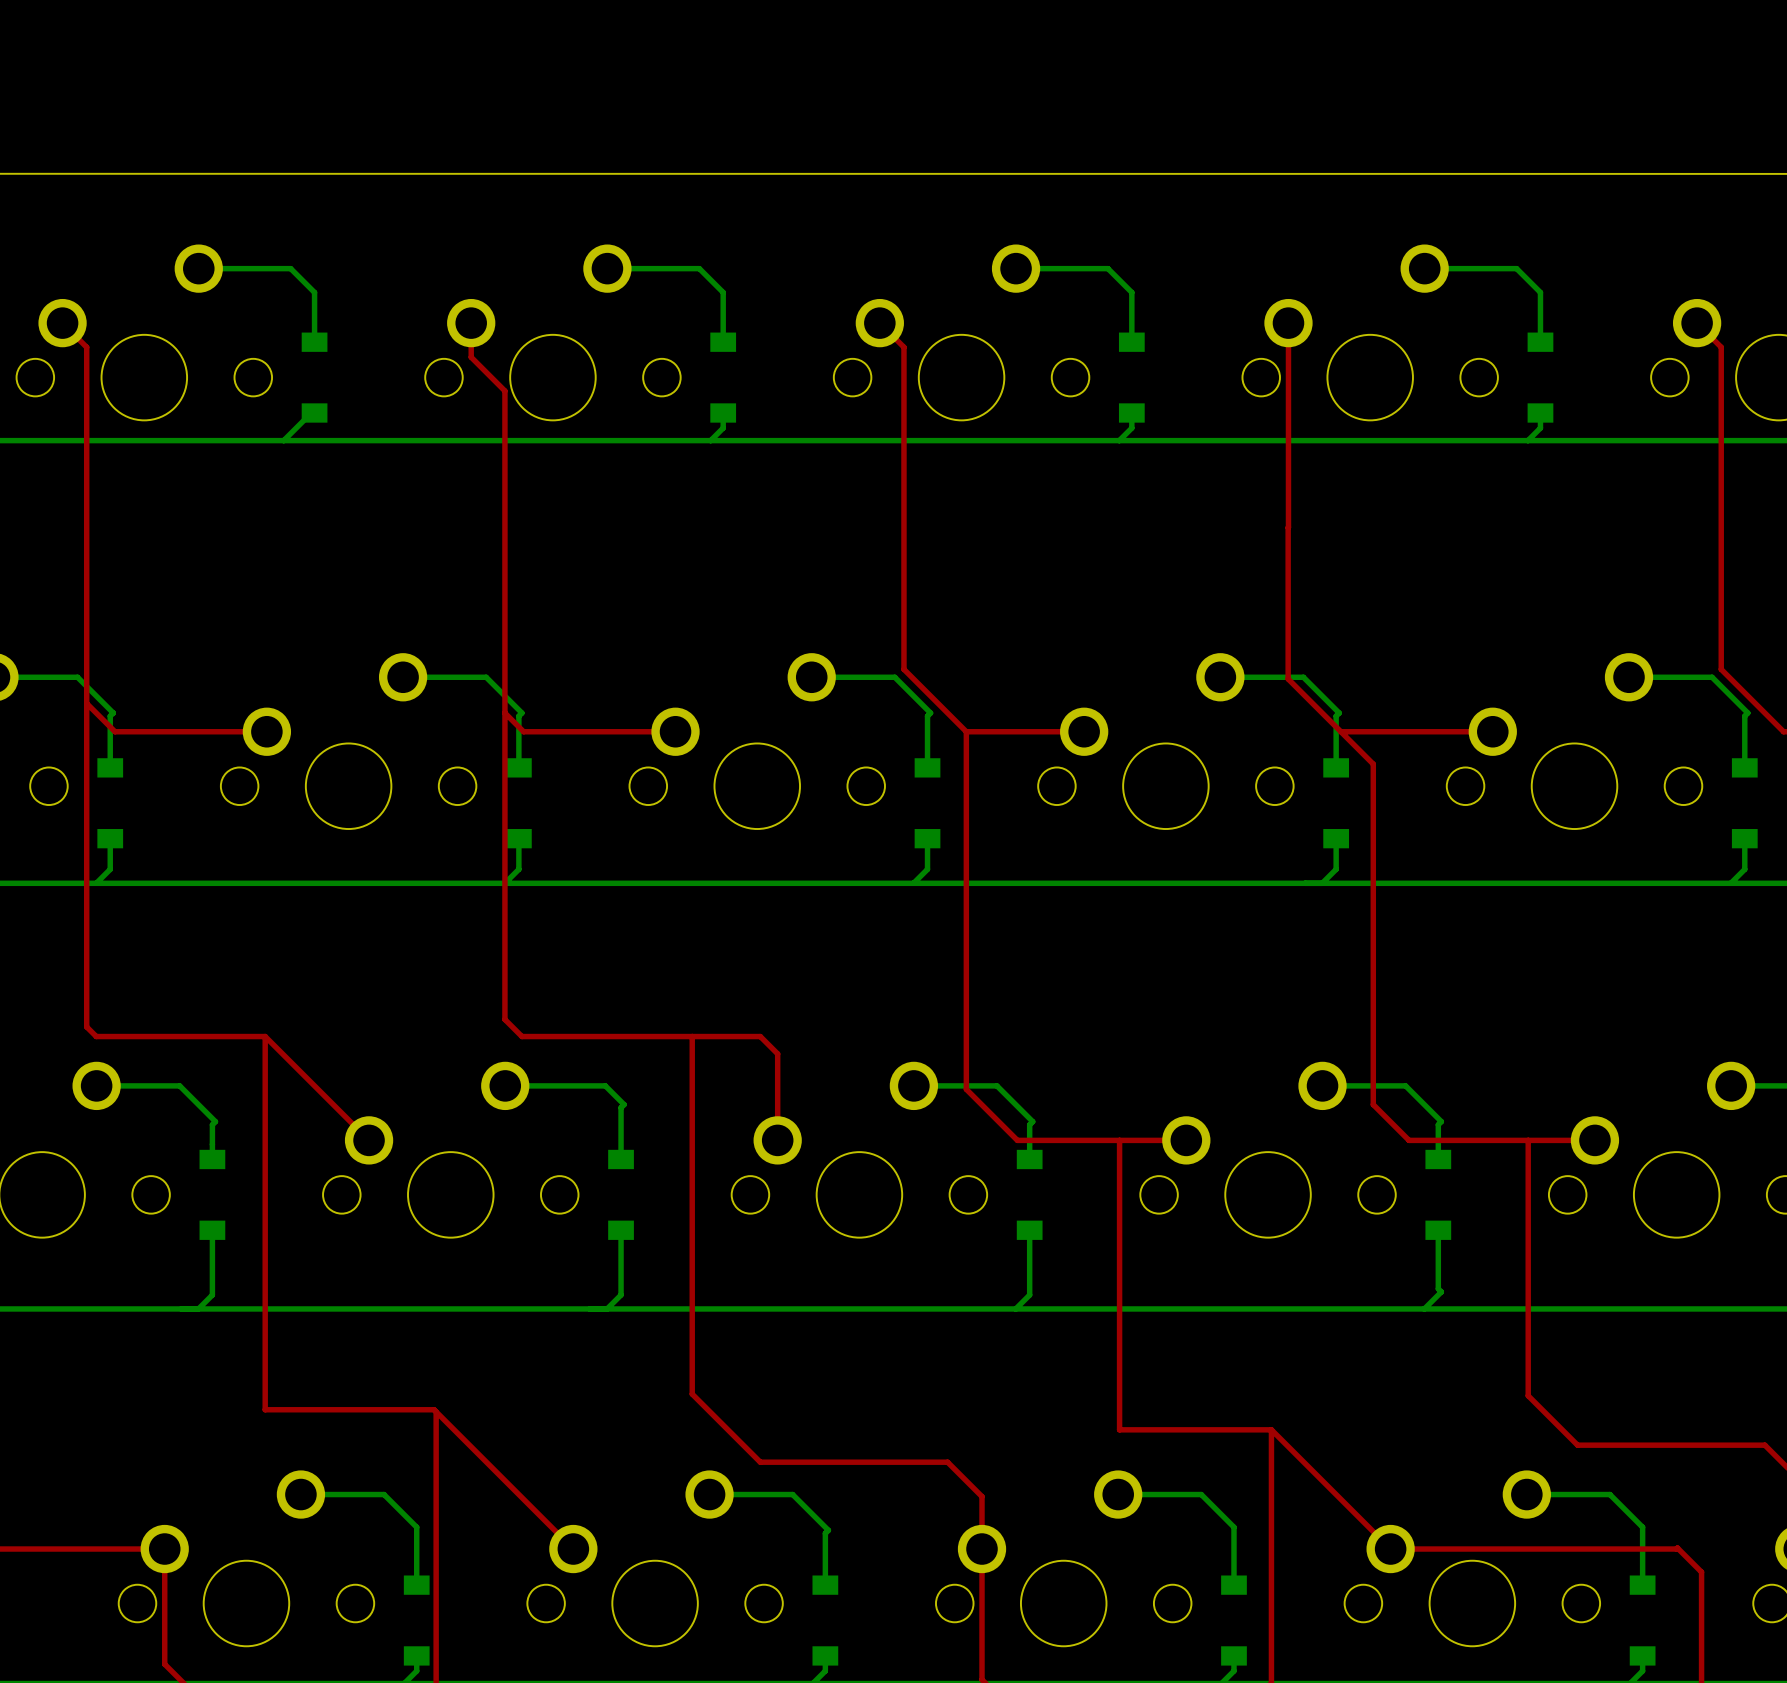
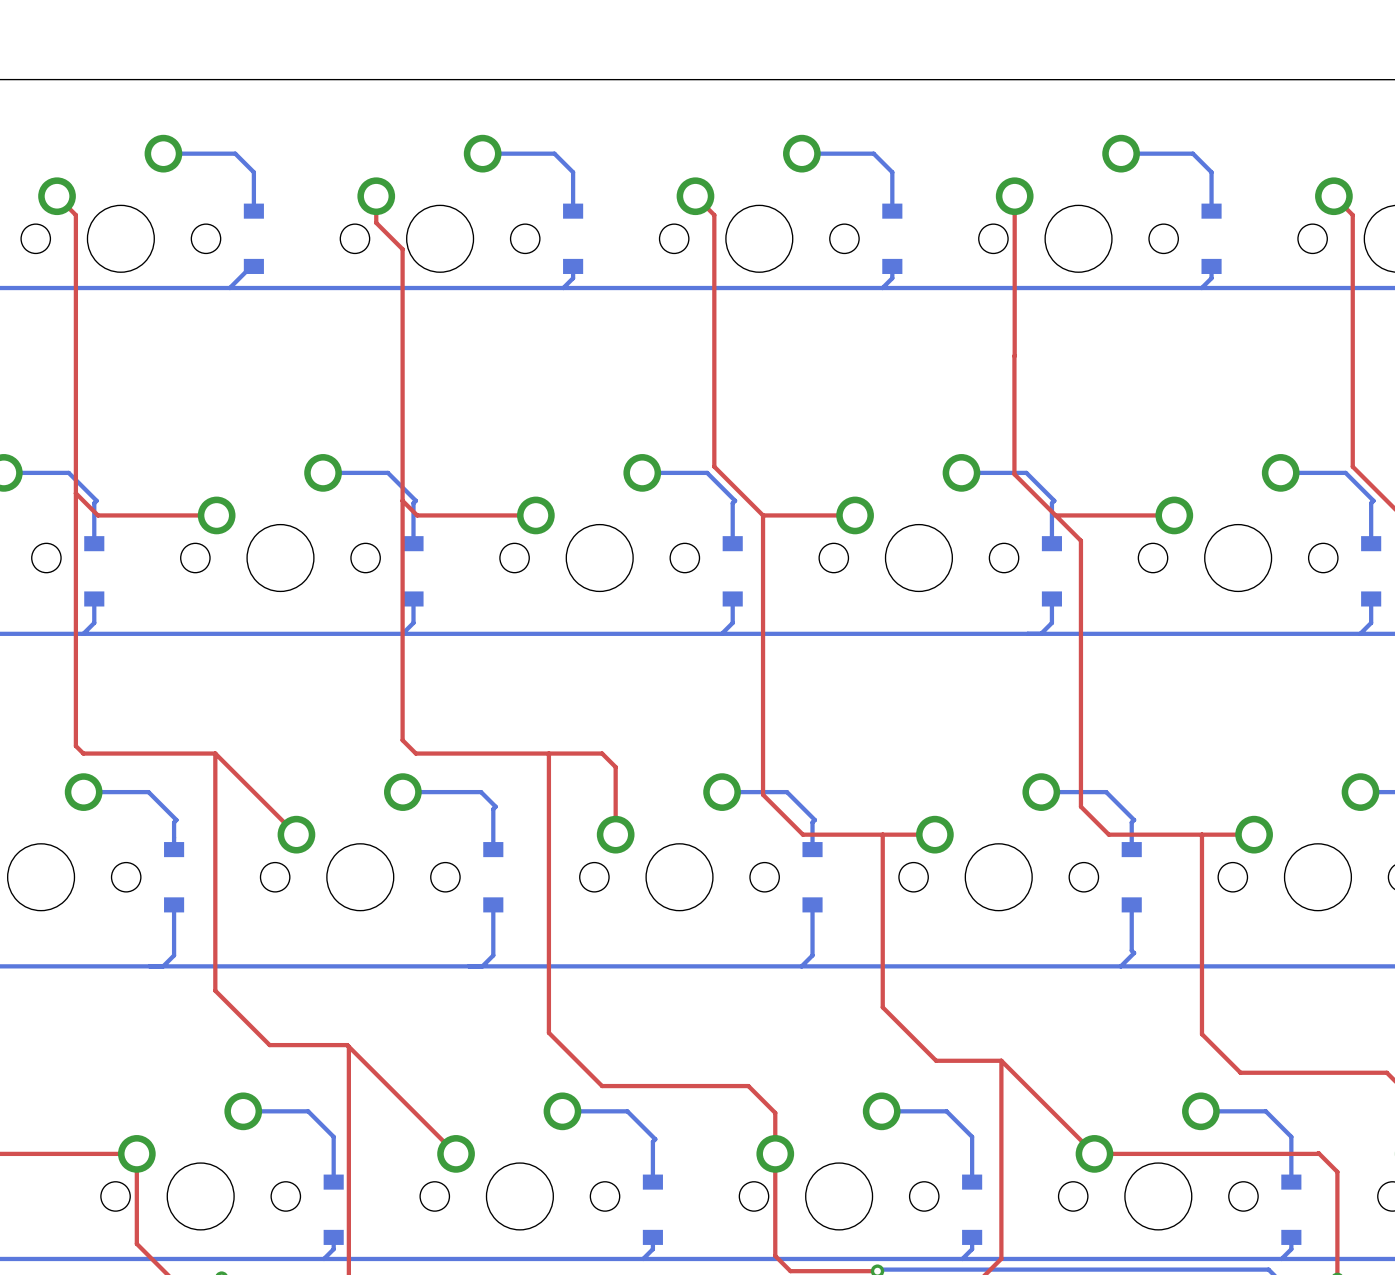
top track: (265, 1340) (265, 1409) (334, 1409) -> (215, 990) (269, 1045)
top track: (1119, 1361) (1119, 1429) (1187, 1429) -> (882, 1007) (936, 1060)

